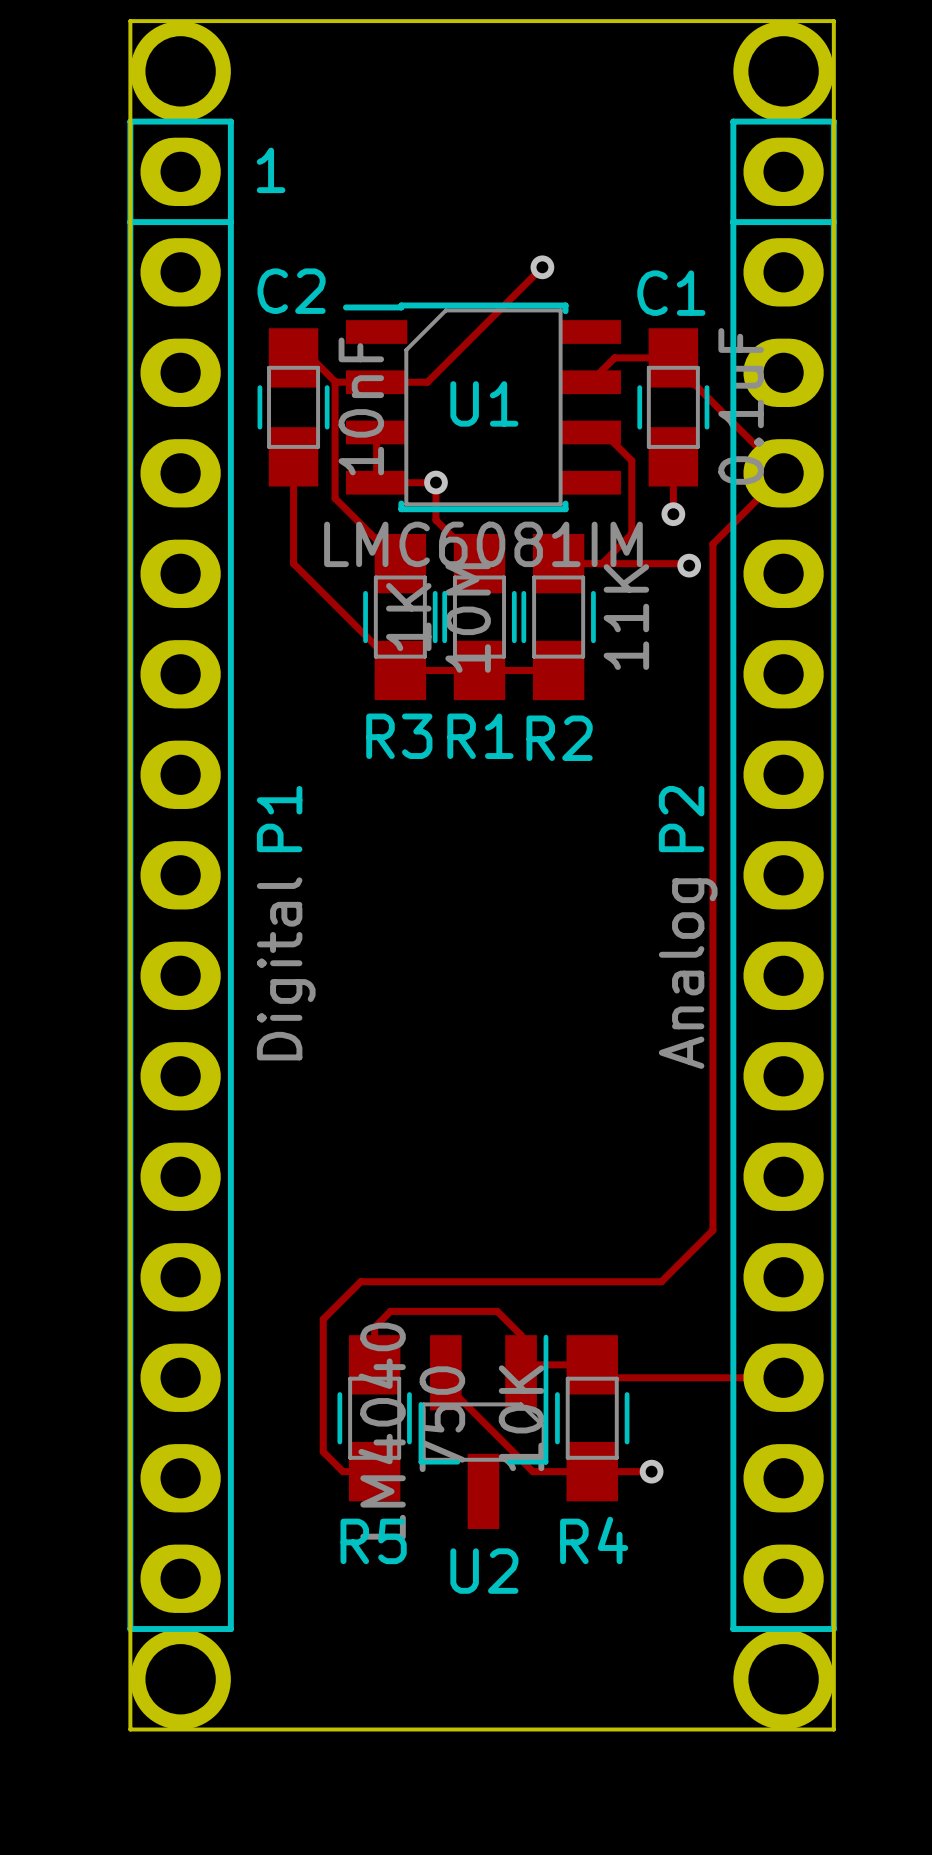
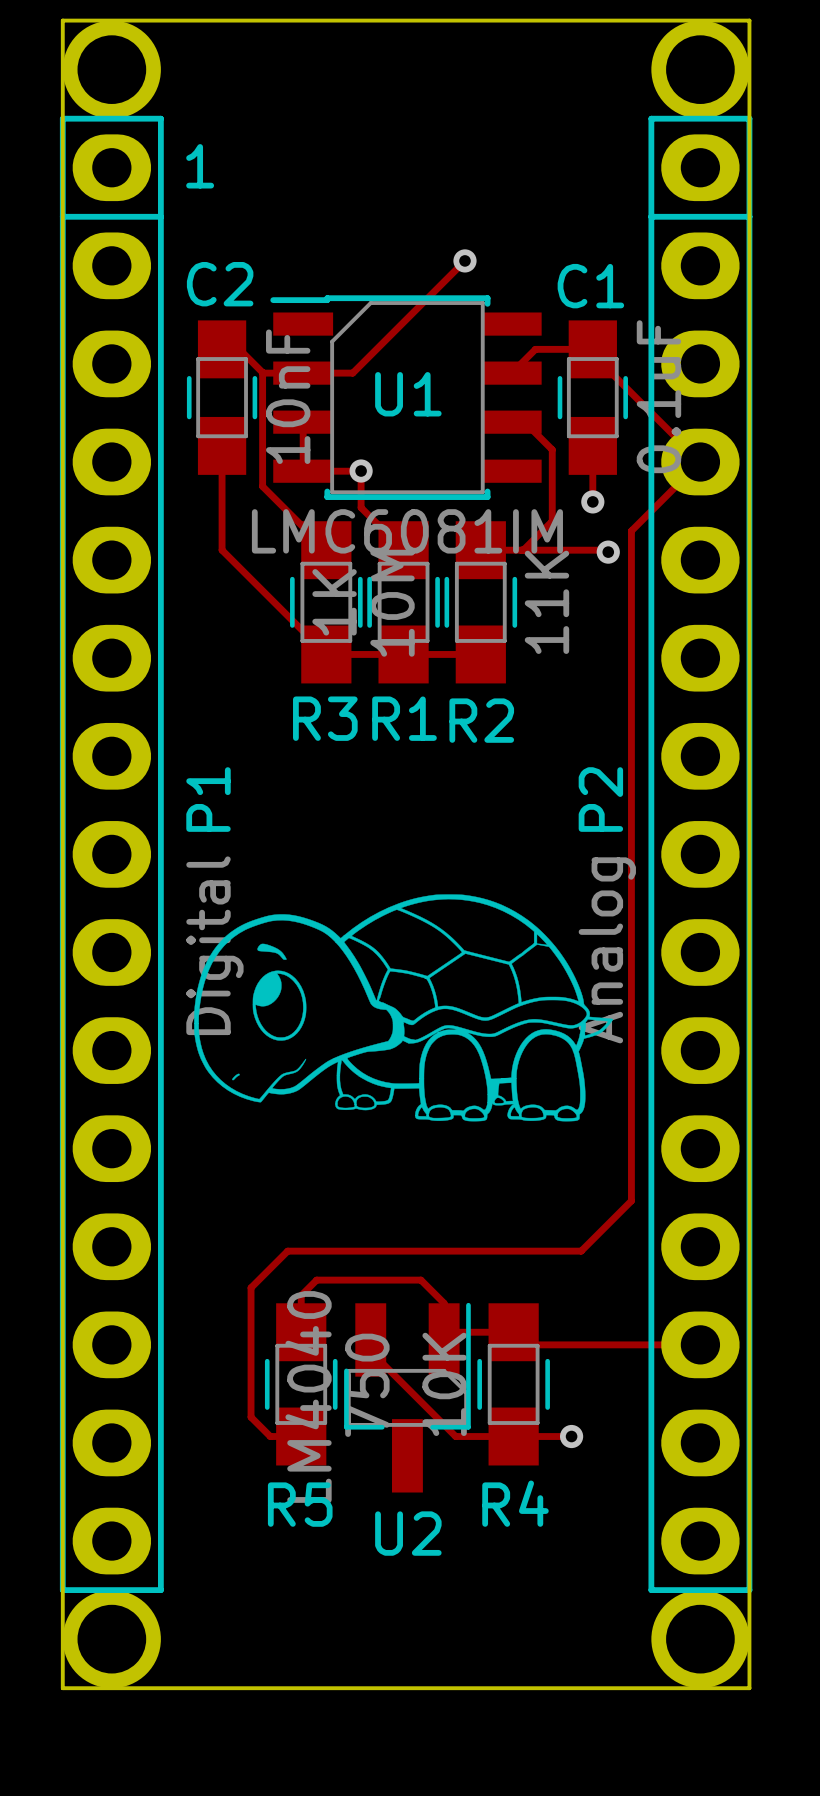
drawing: none -> [194, 894, 614, 1122]

